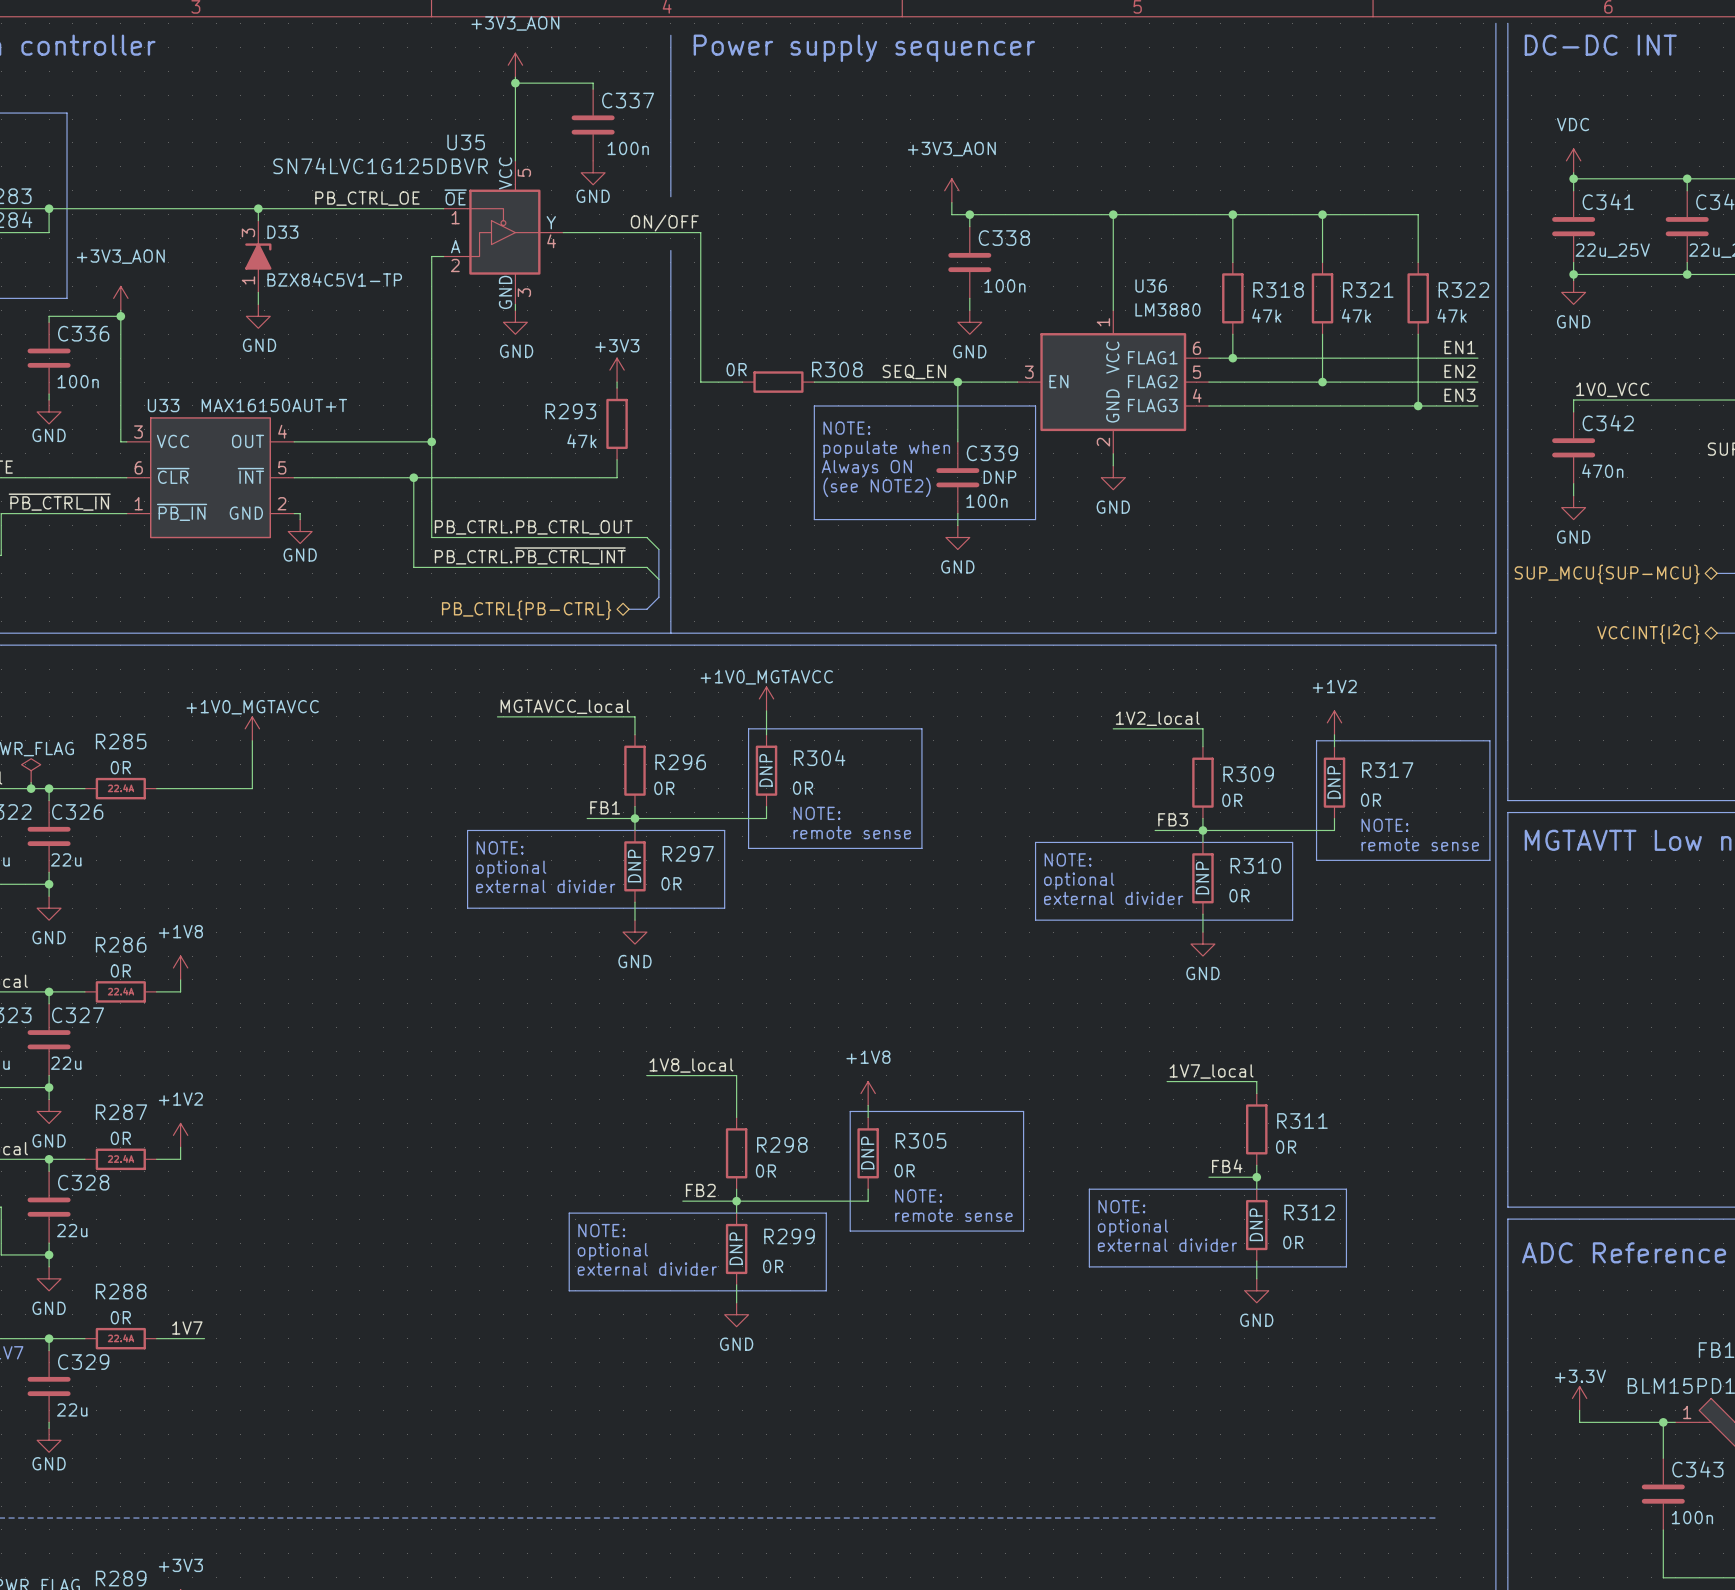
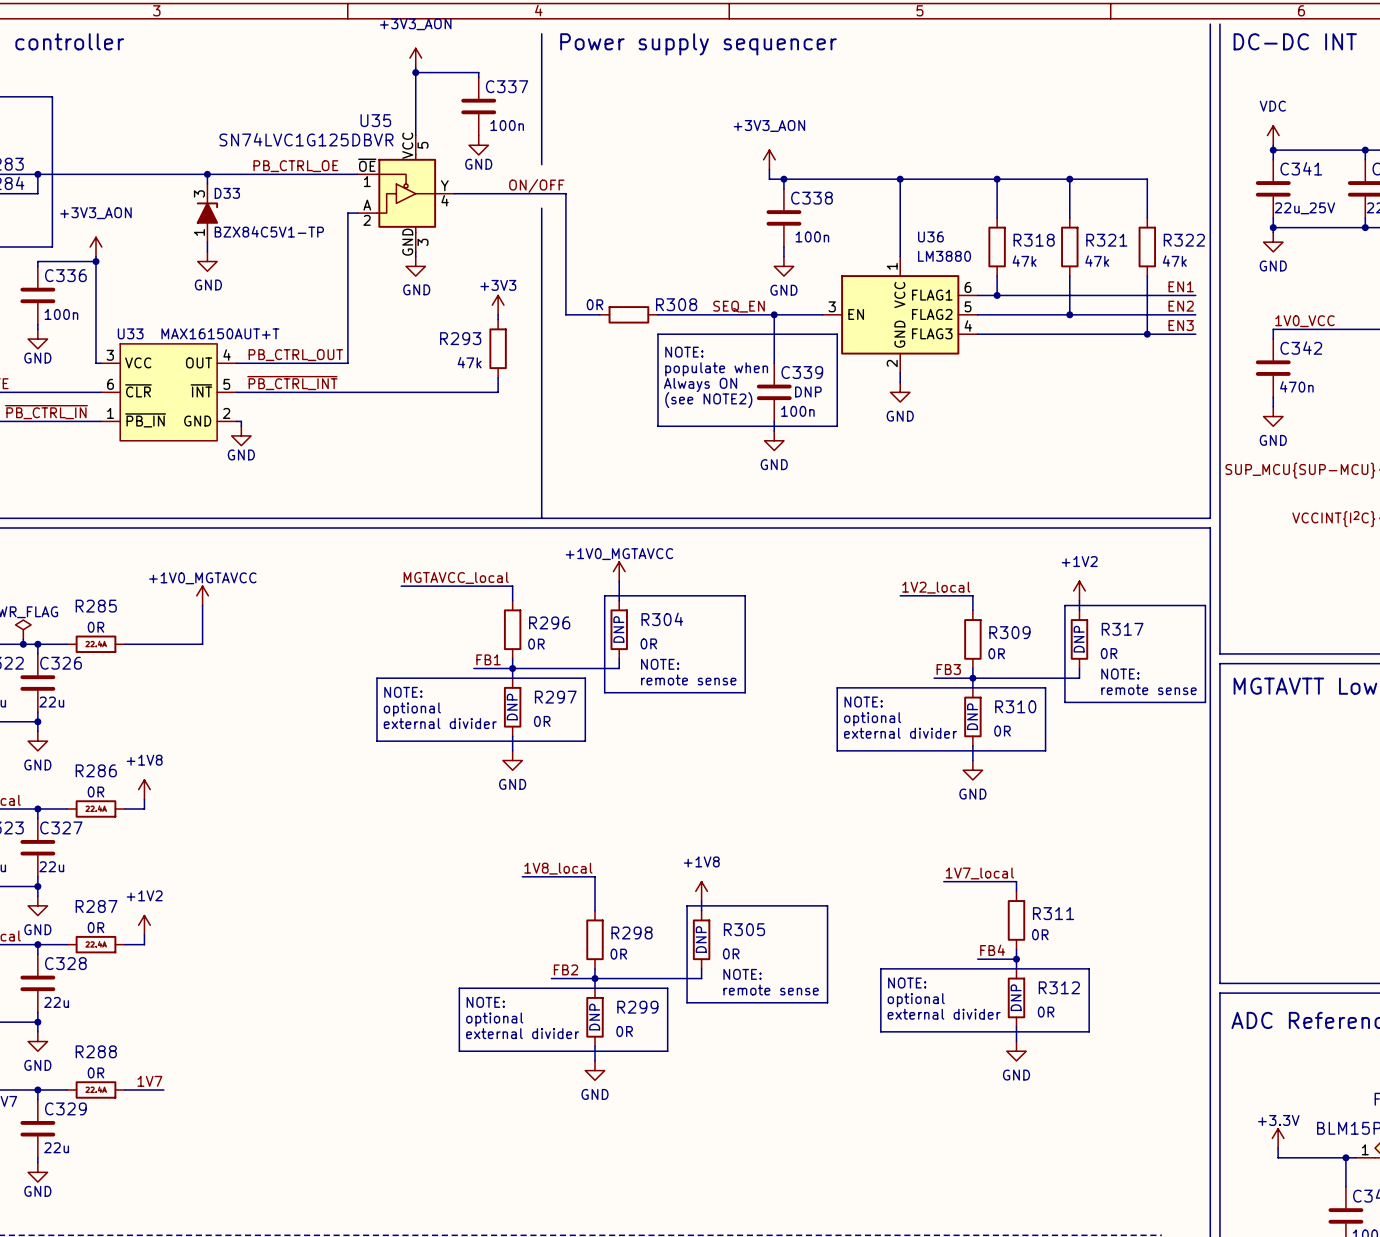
label: none -> PB_CTRL_OUT (295, 355)
wire: (431, 441) (431, 537) (646, 537) (658, 549) -> none
junction: (431, 441) -> none
label: none -> ~{PB_CTRL_INT} (292, 383)
wire: (413, 477) (413, 567) (646, 567) (658, 579) -> none
junction: (413, 477) -> none
label: PB_CTRL.PB_CTRL_OUT (533, 527) -> none
bus: (658, 549) (658, 597) (646, 609) (629, 609) -> none
label: PB_CTRL.~{PB_CTRL_INT} (530, 555) -> none
hierarchical label: PB_CTRL{PB-CTRL} (526, 610) -> none

